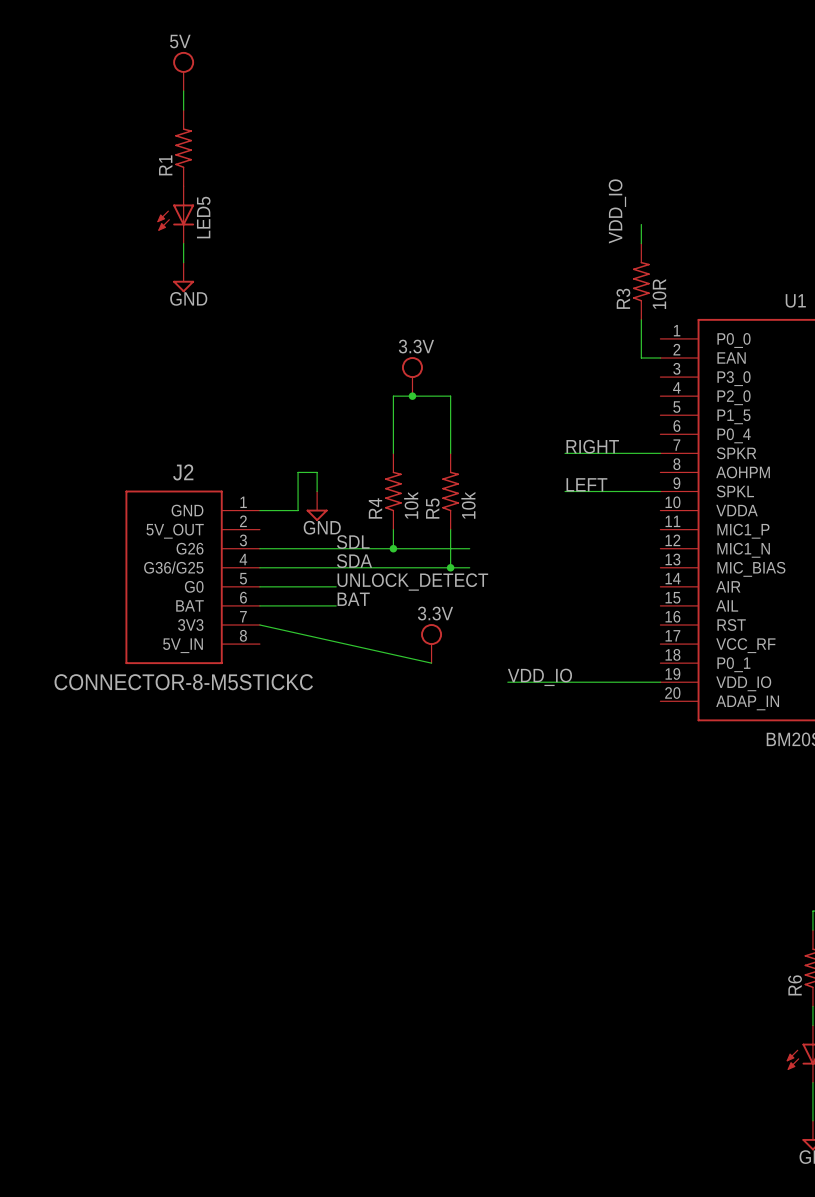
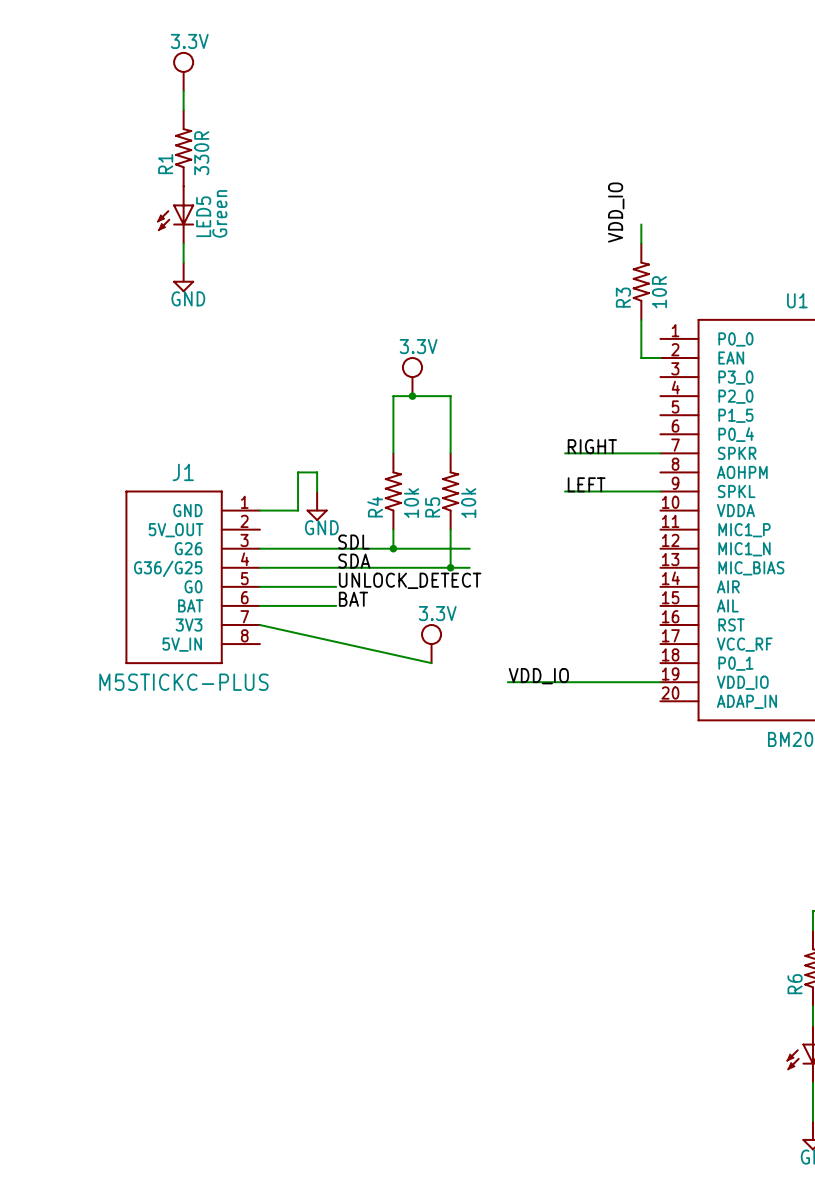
power symbol: 5V (183, 71) -> 3.3V (183, 71)
R1 value: none -> 330R (201, 153)
LED5 value: none -> Green (219, 213)
J2 name: J2 (183, 472) -> J1 (183, 472)
J2 value: CONNECTOR-8-M5STICKC (183, 682) -> M5STICKC-PLUS (183, 682)

